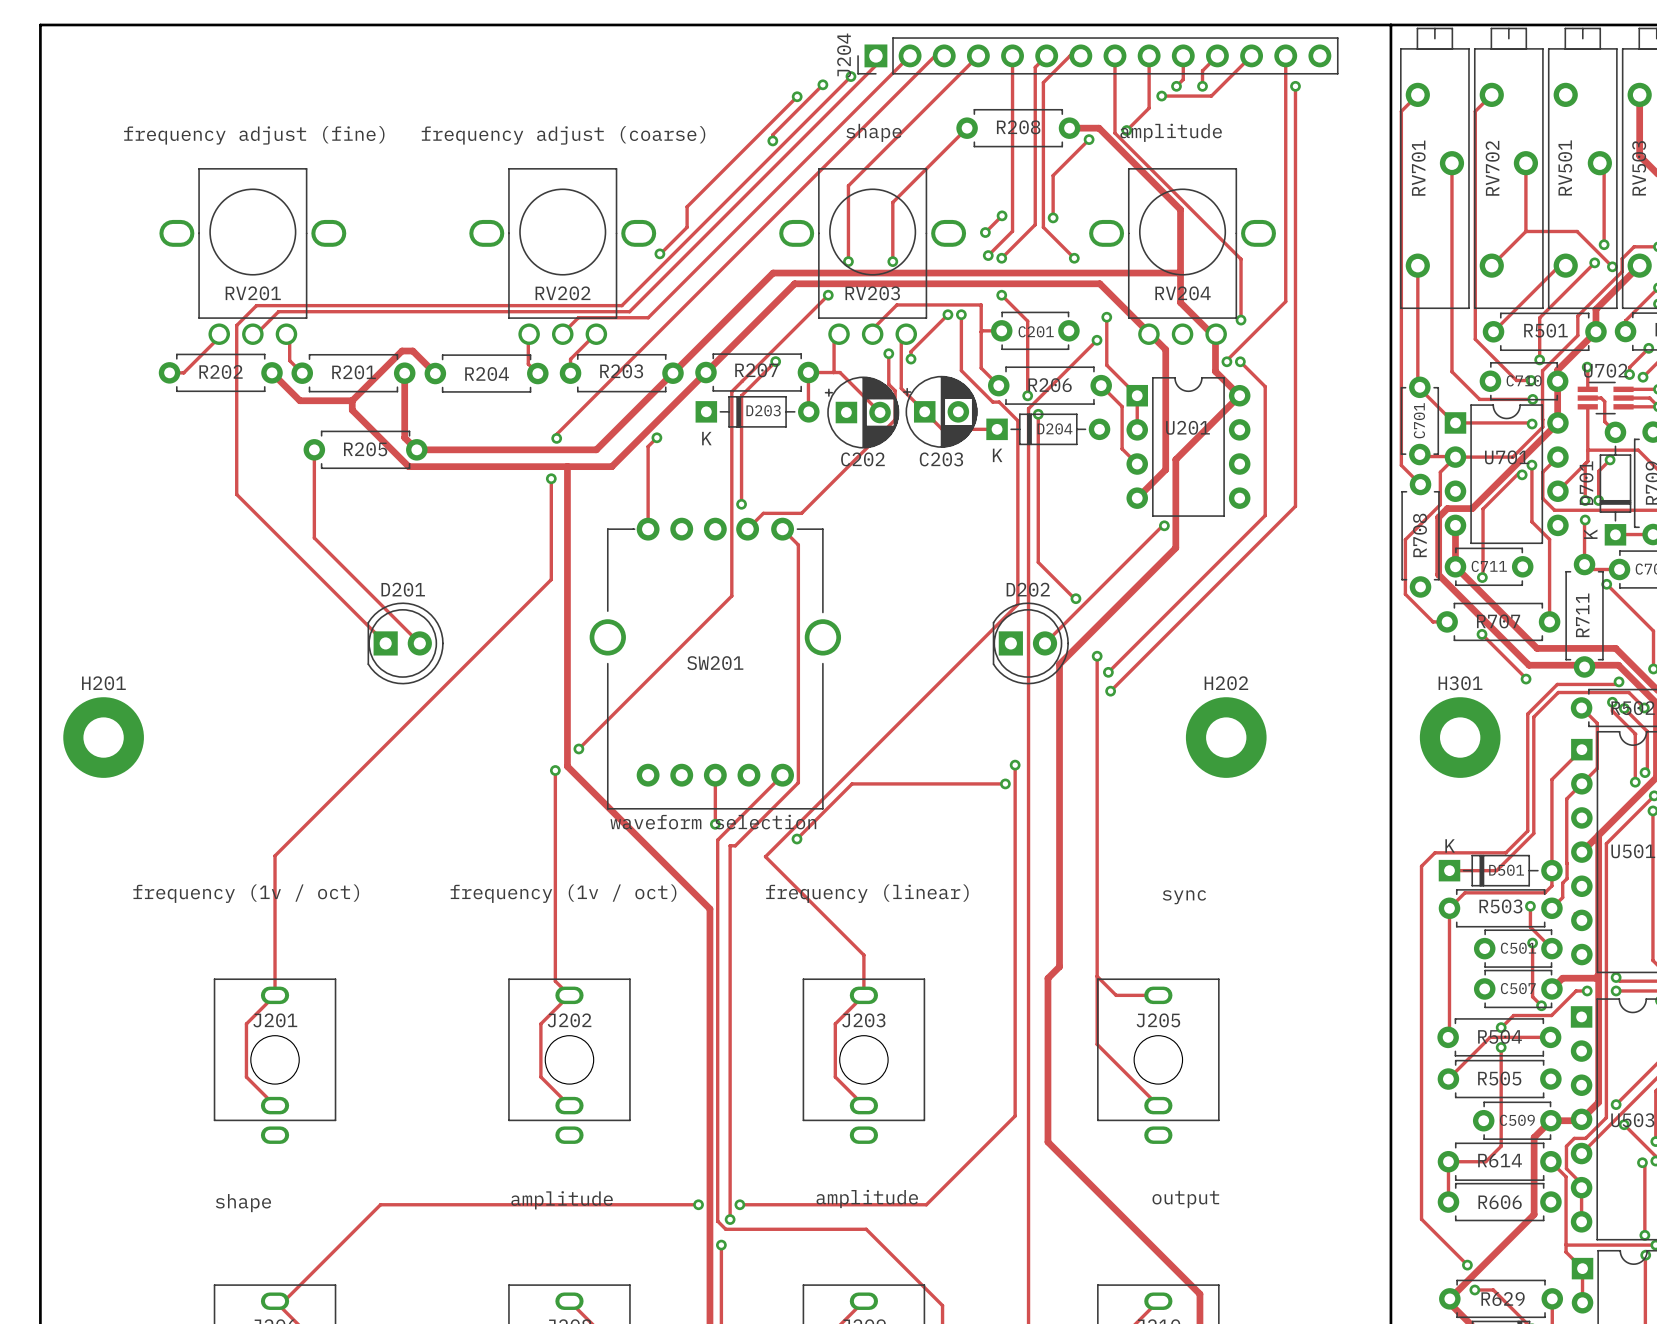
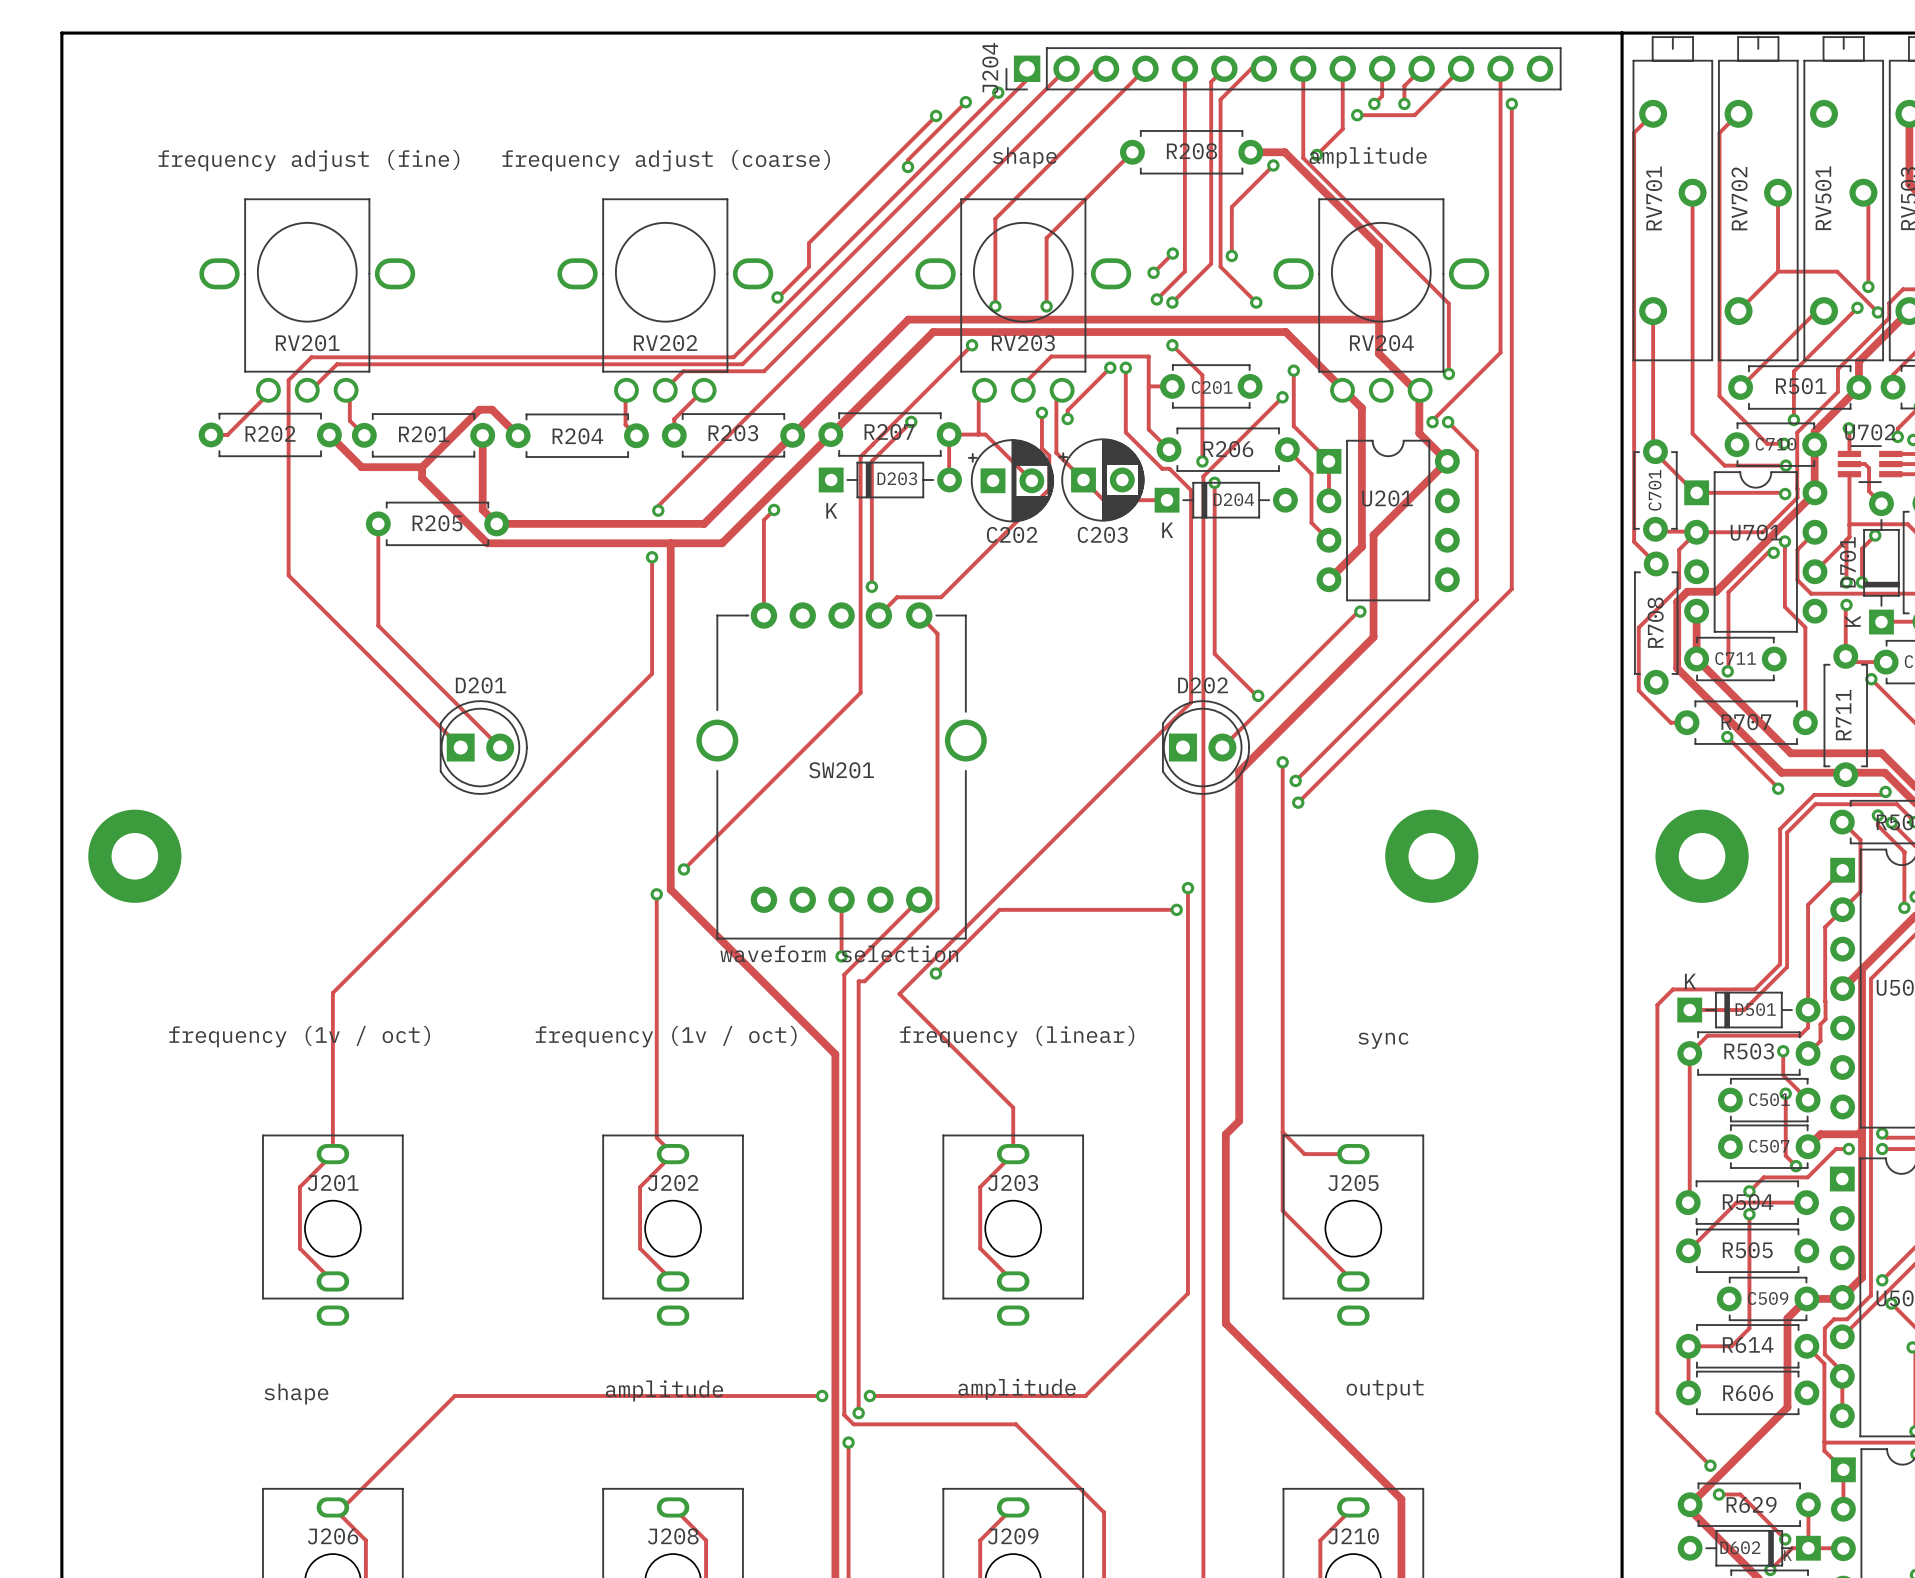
H201 name: H201 (103, 683) -> none
H202 name: H202 (1226, 683) -> none
H301 name: H301 (1460, 683) -> none

